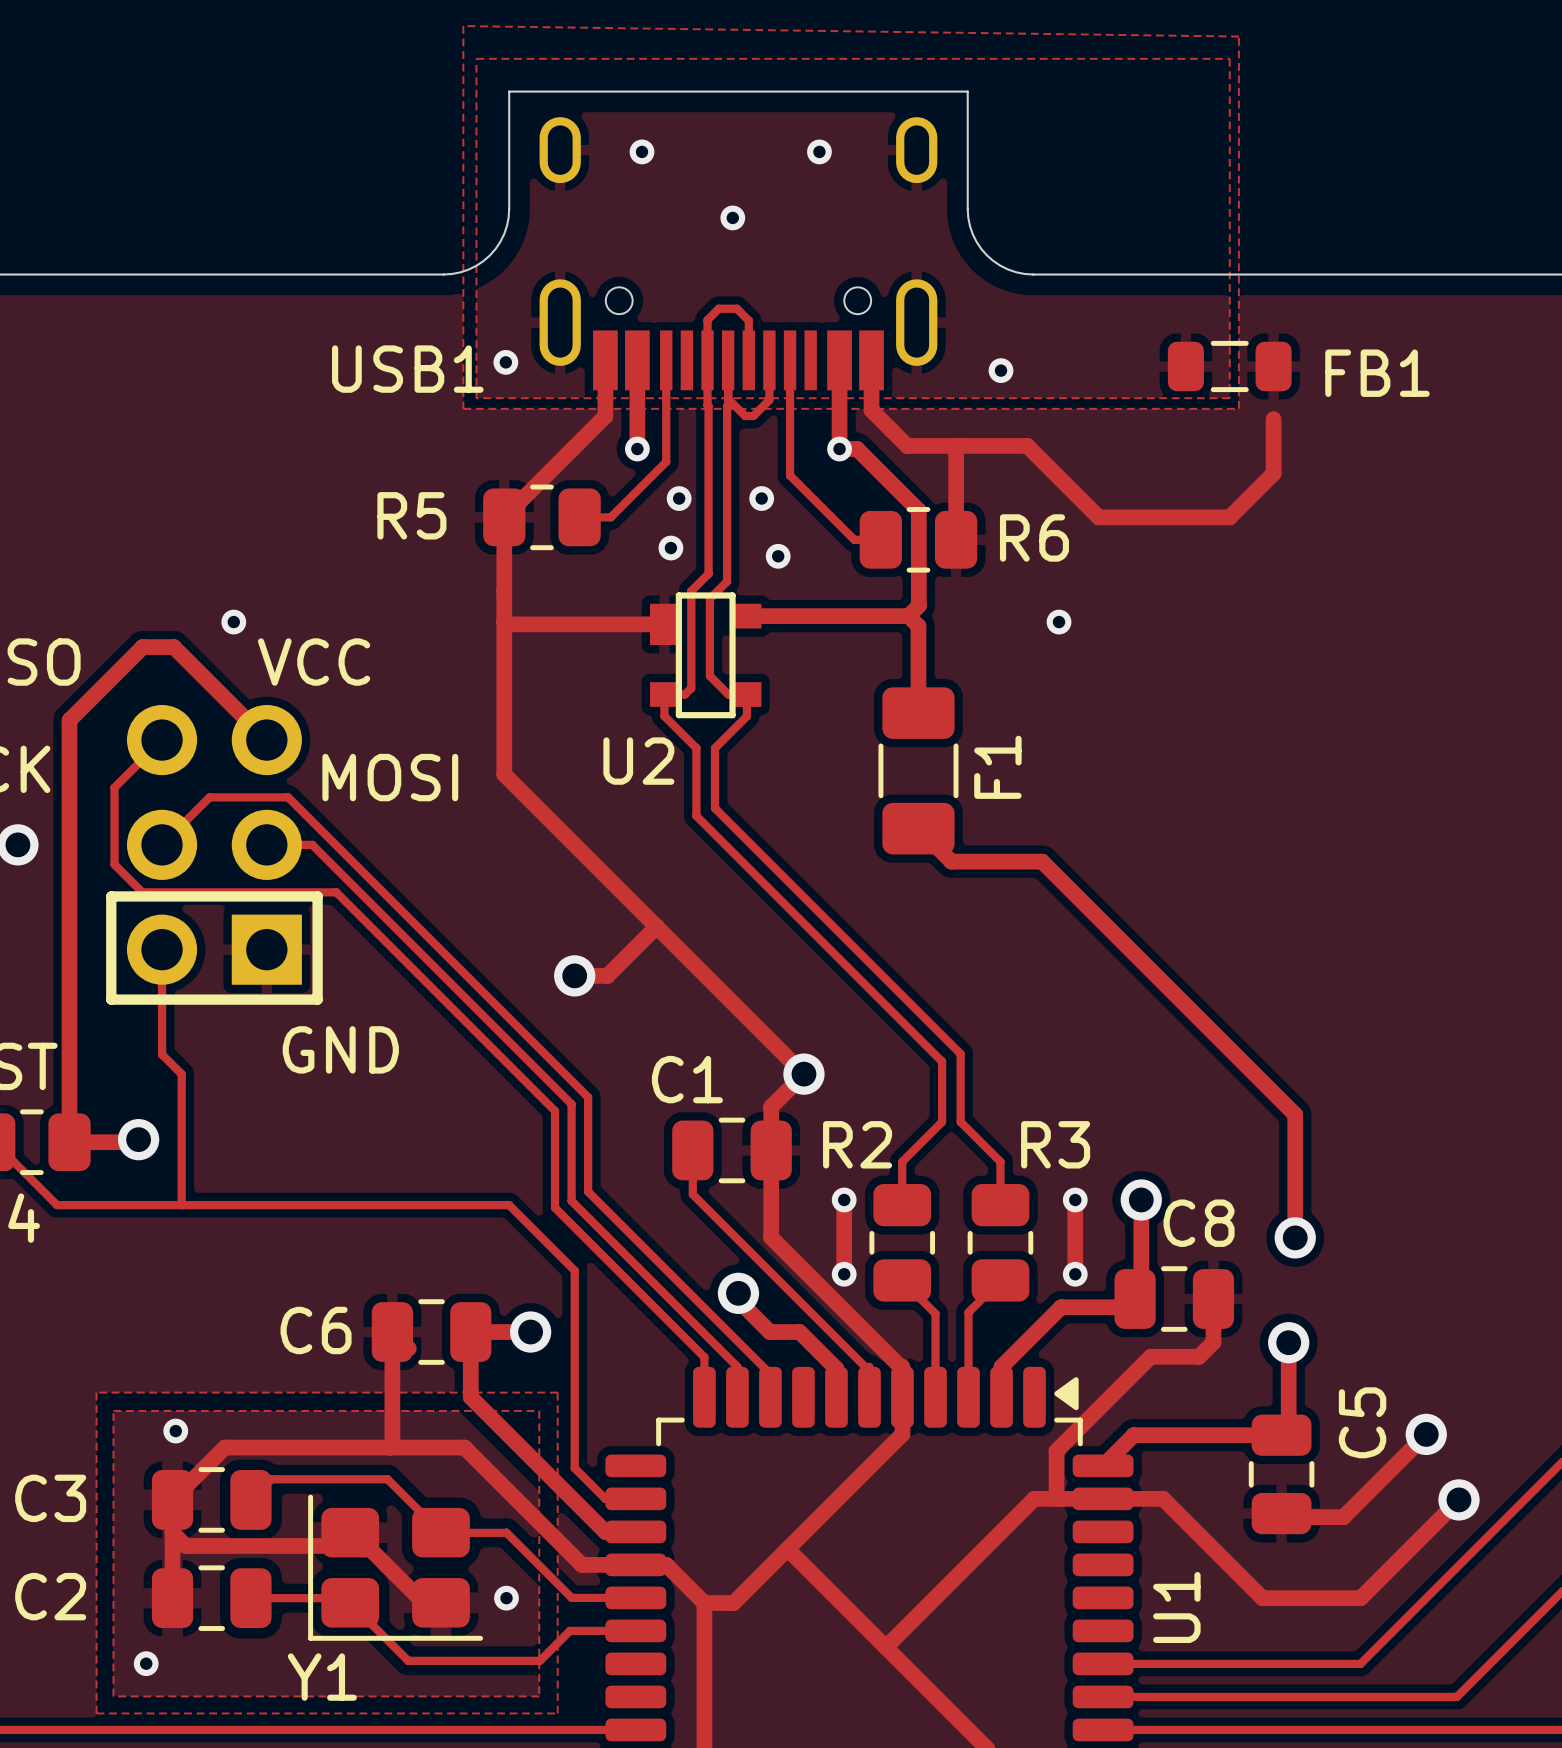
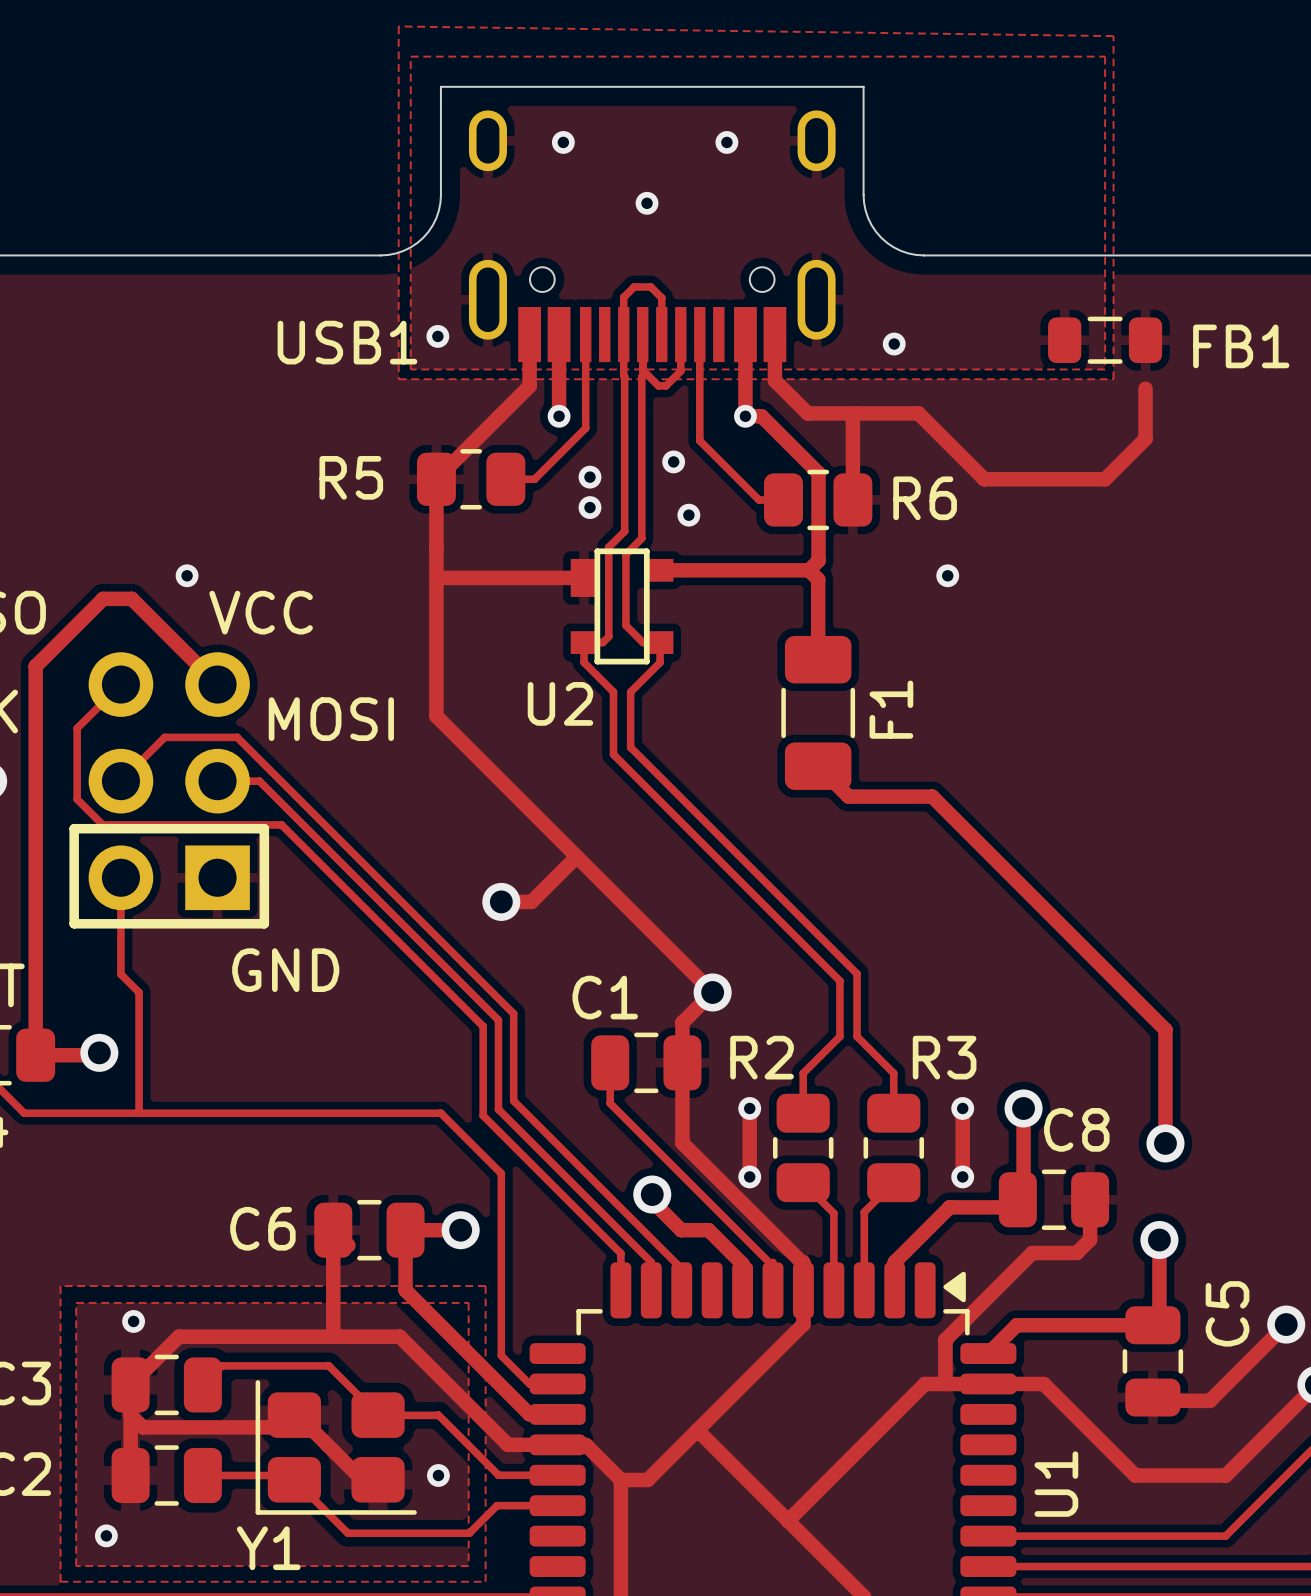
via position: (679, 498) -> (589, 477)

